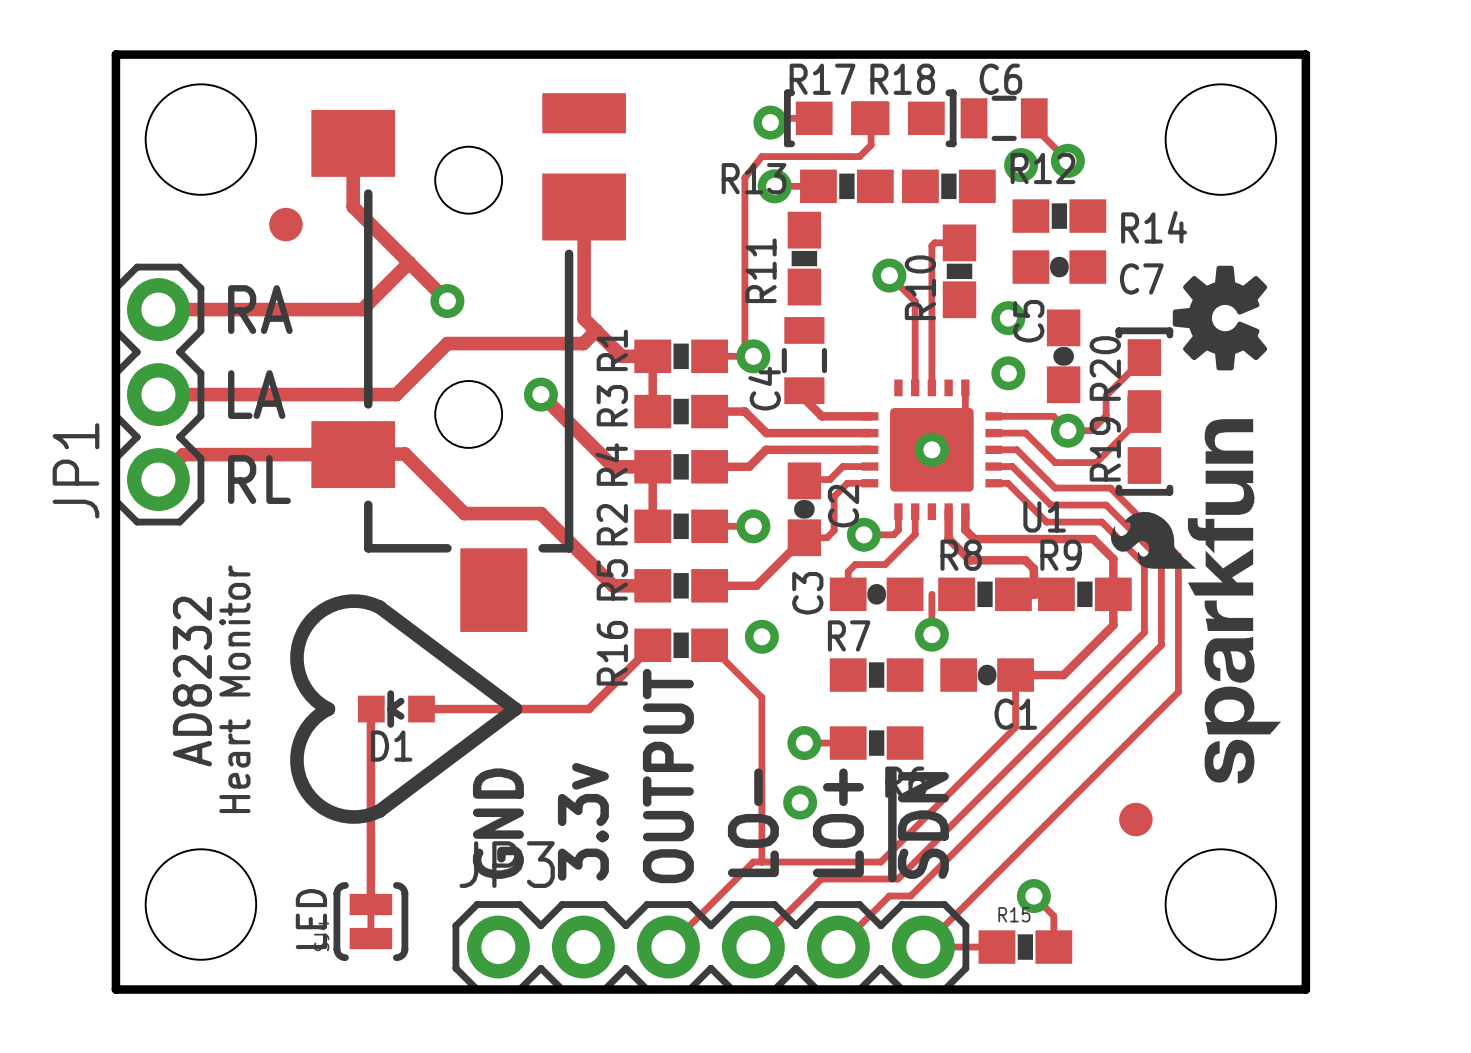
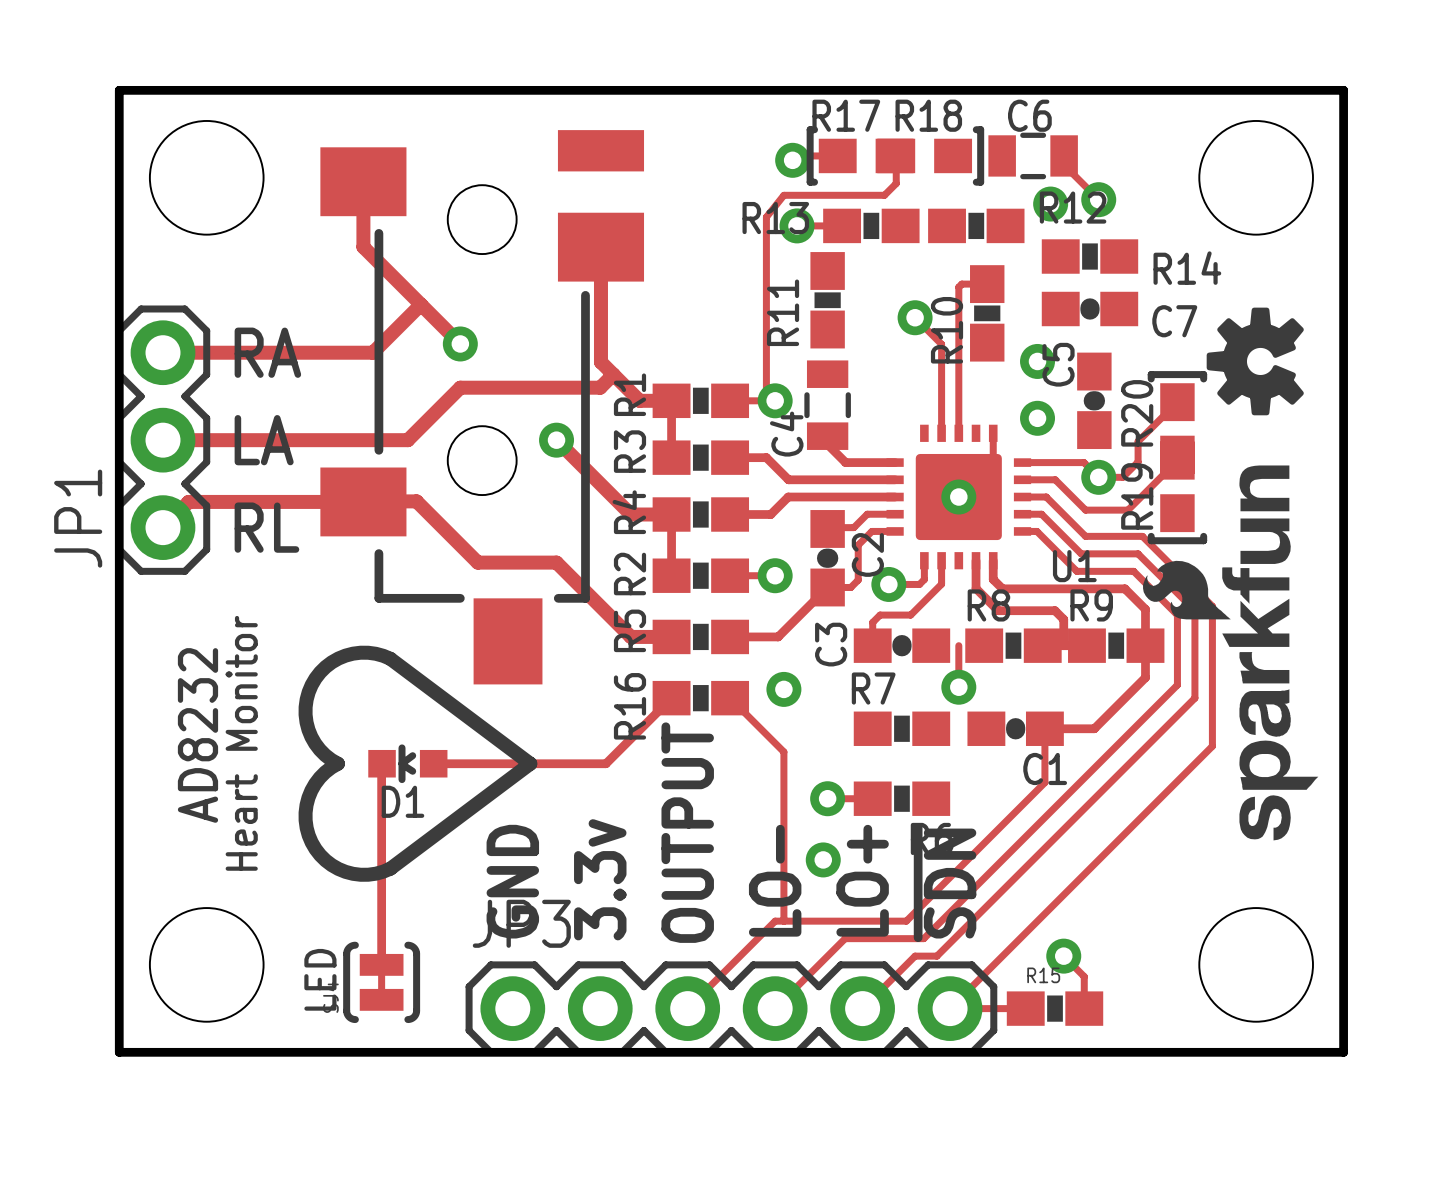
part: (285, 224) -> none
part: (1135, 819) -> none

